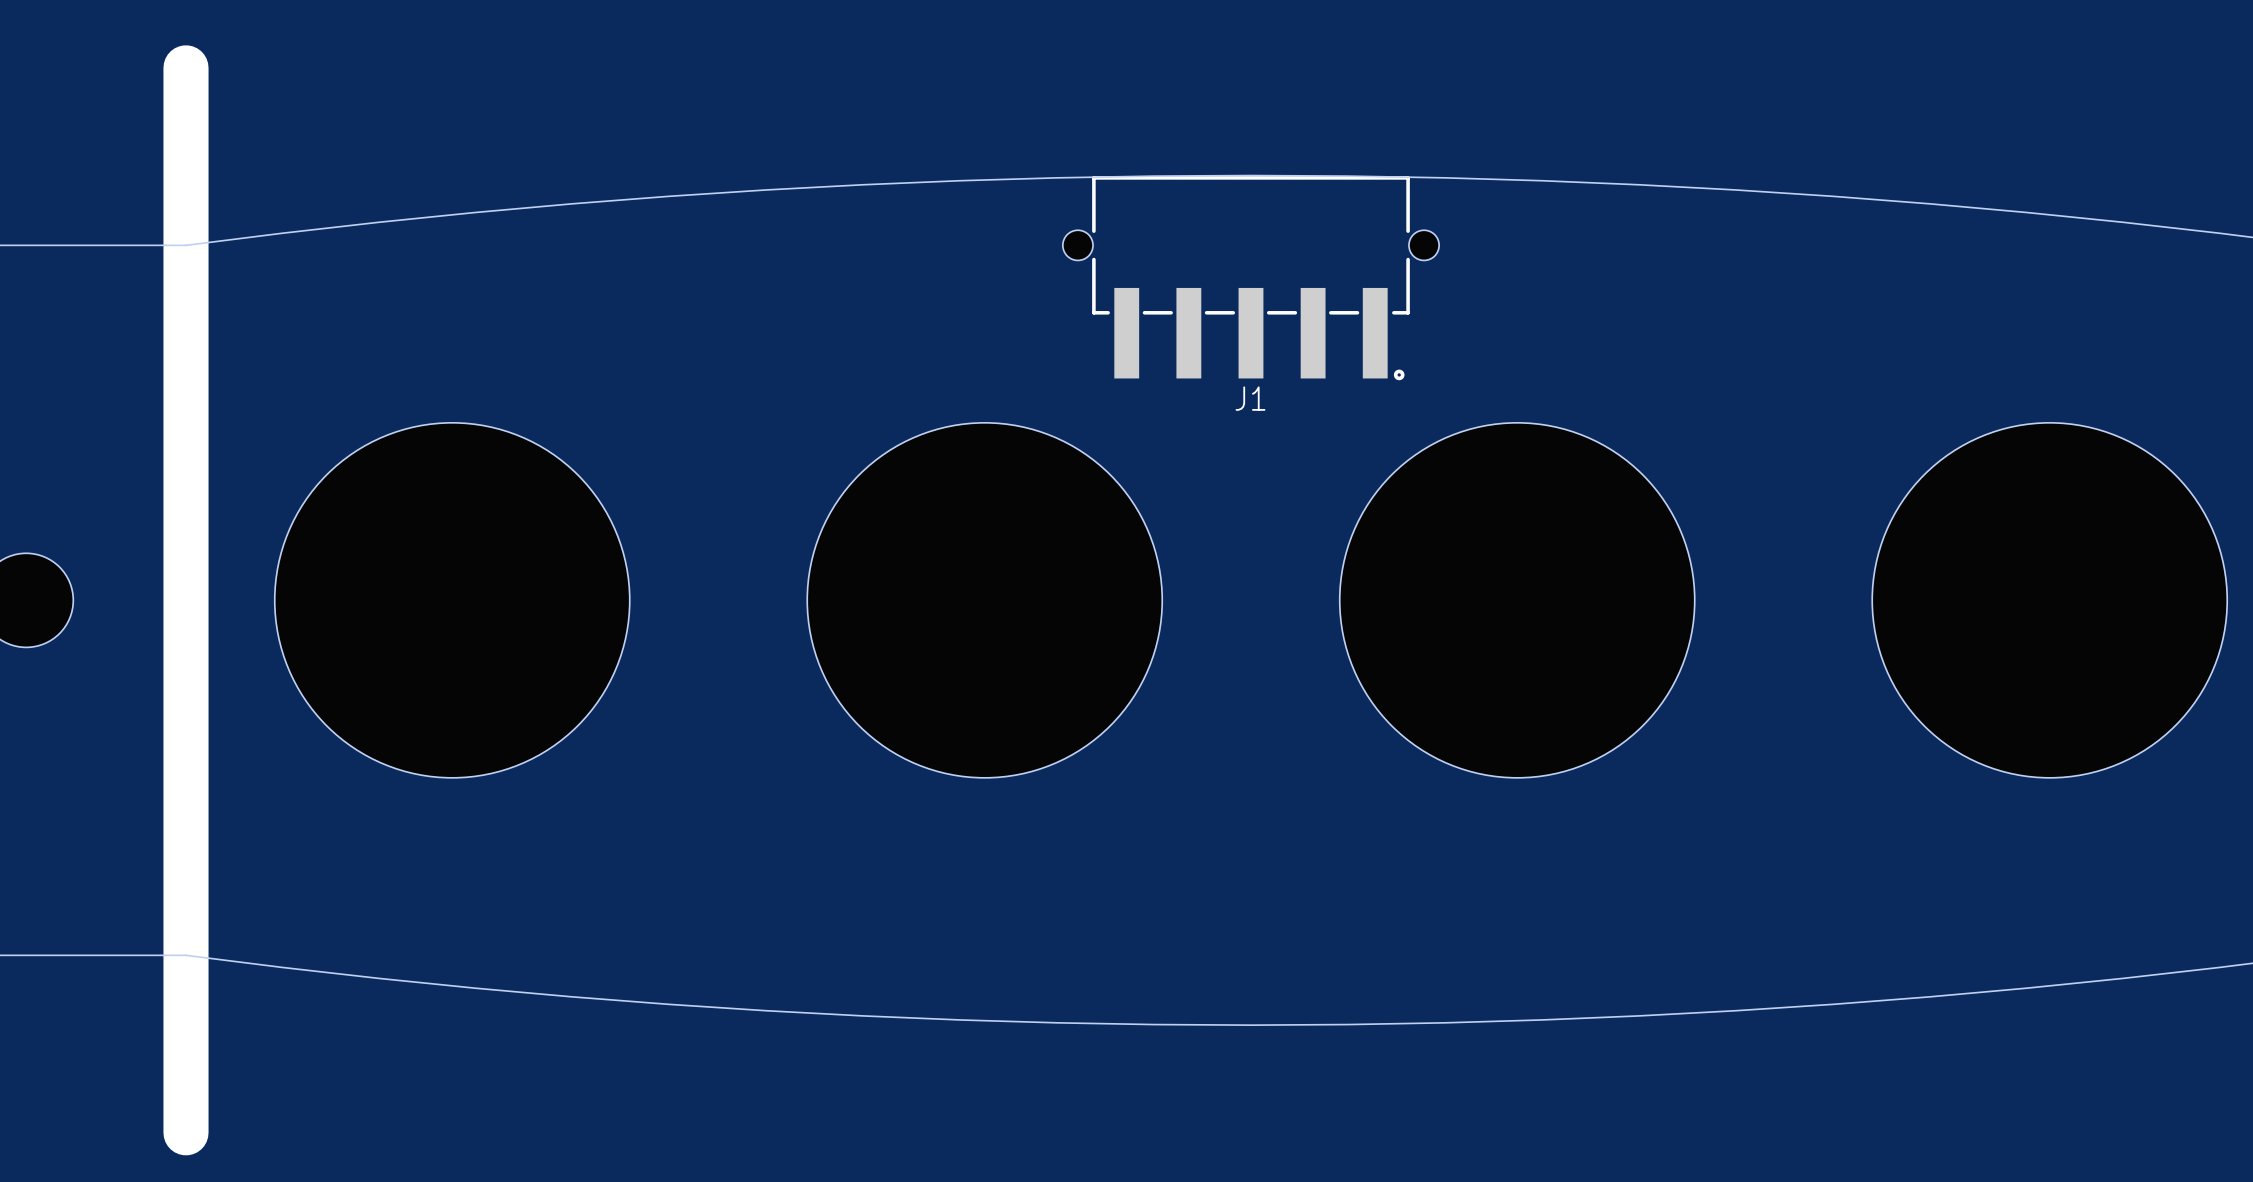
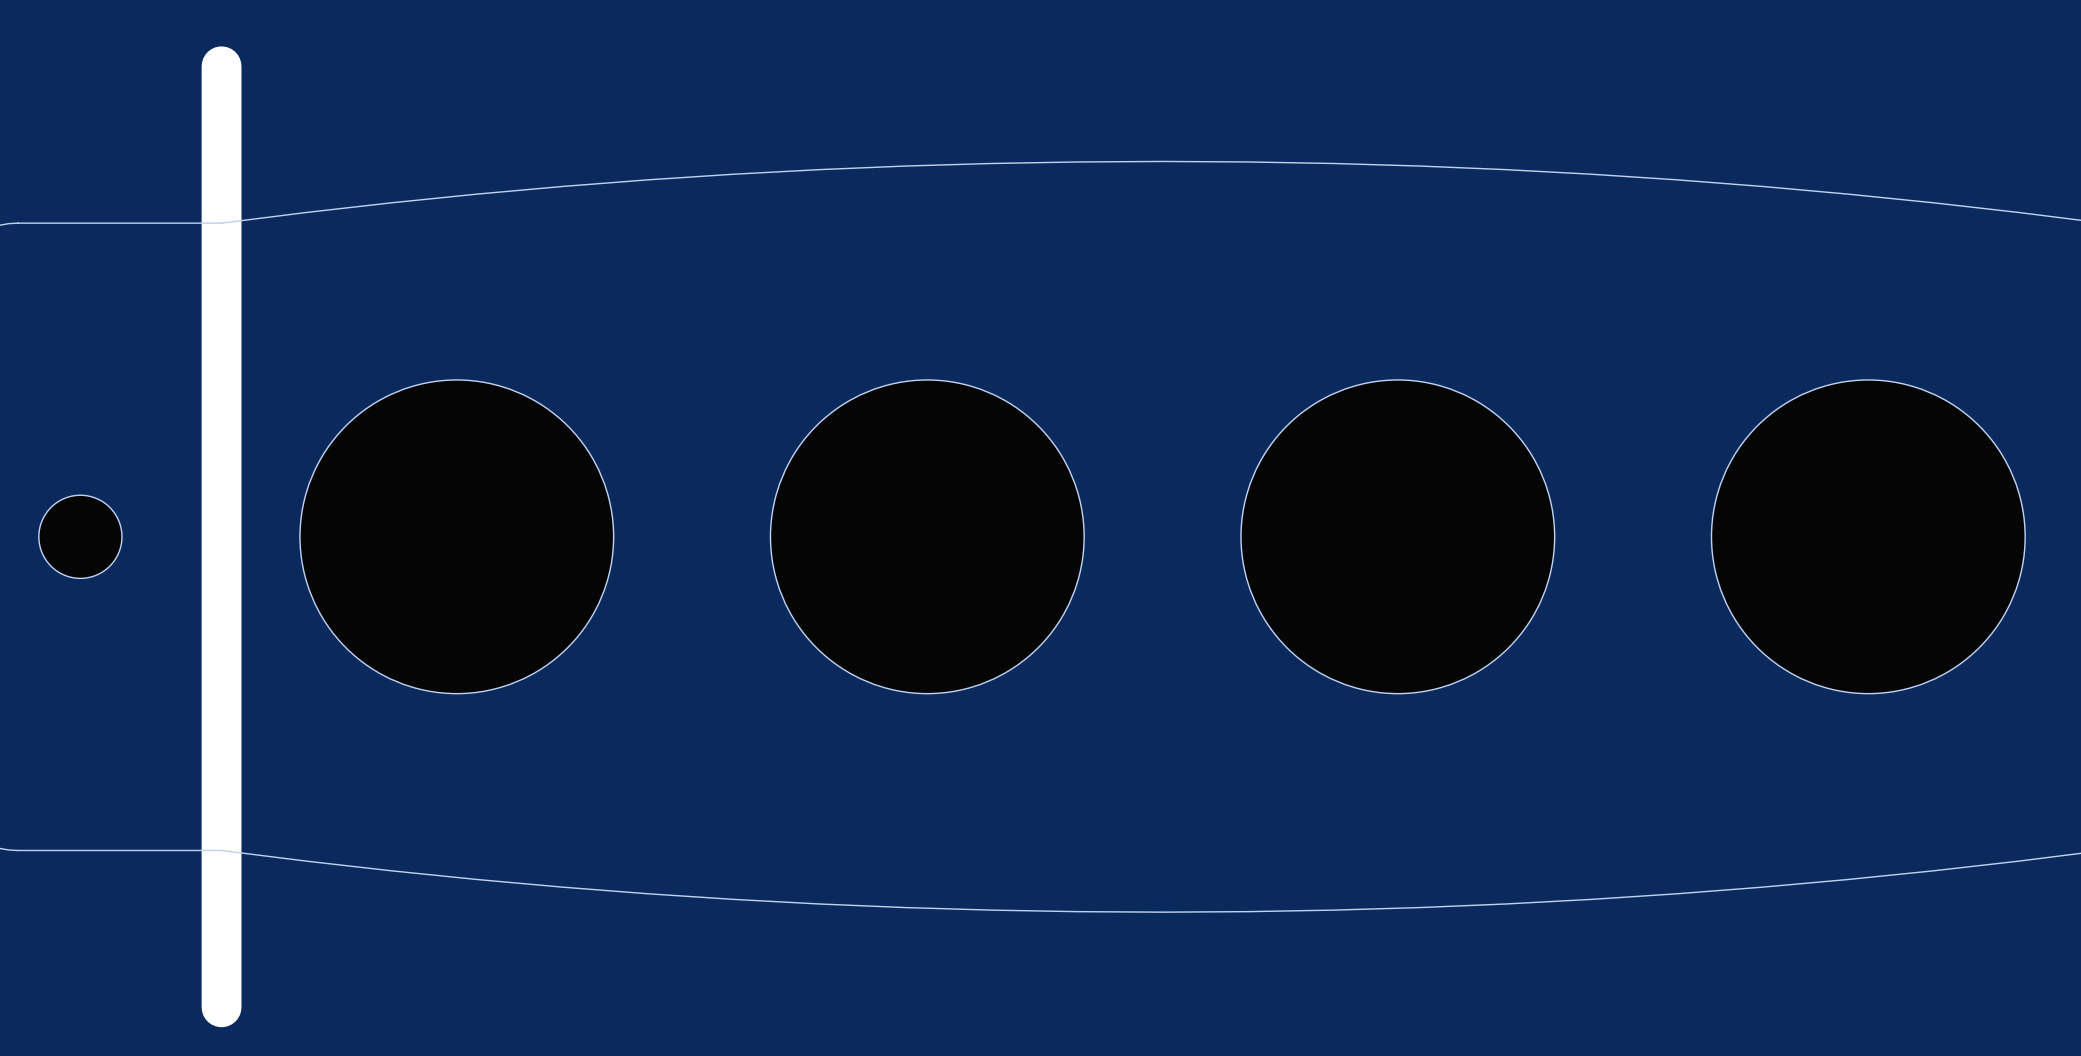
J1: (1250, 278) -> none

